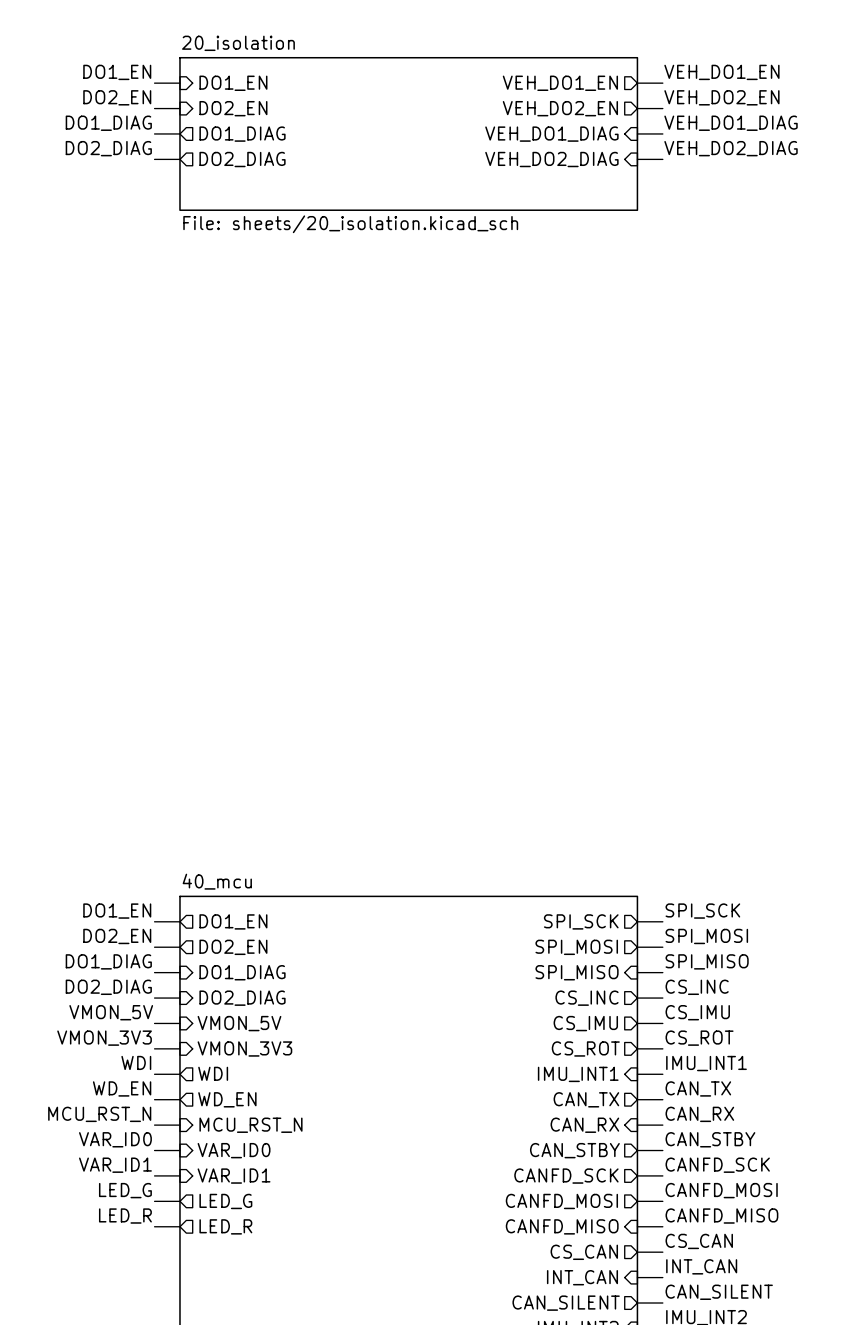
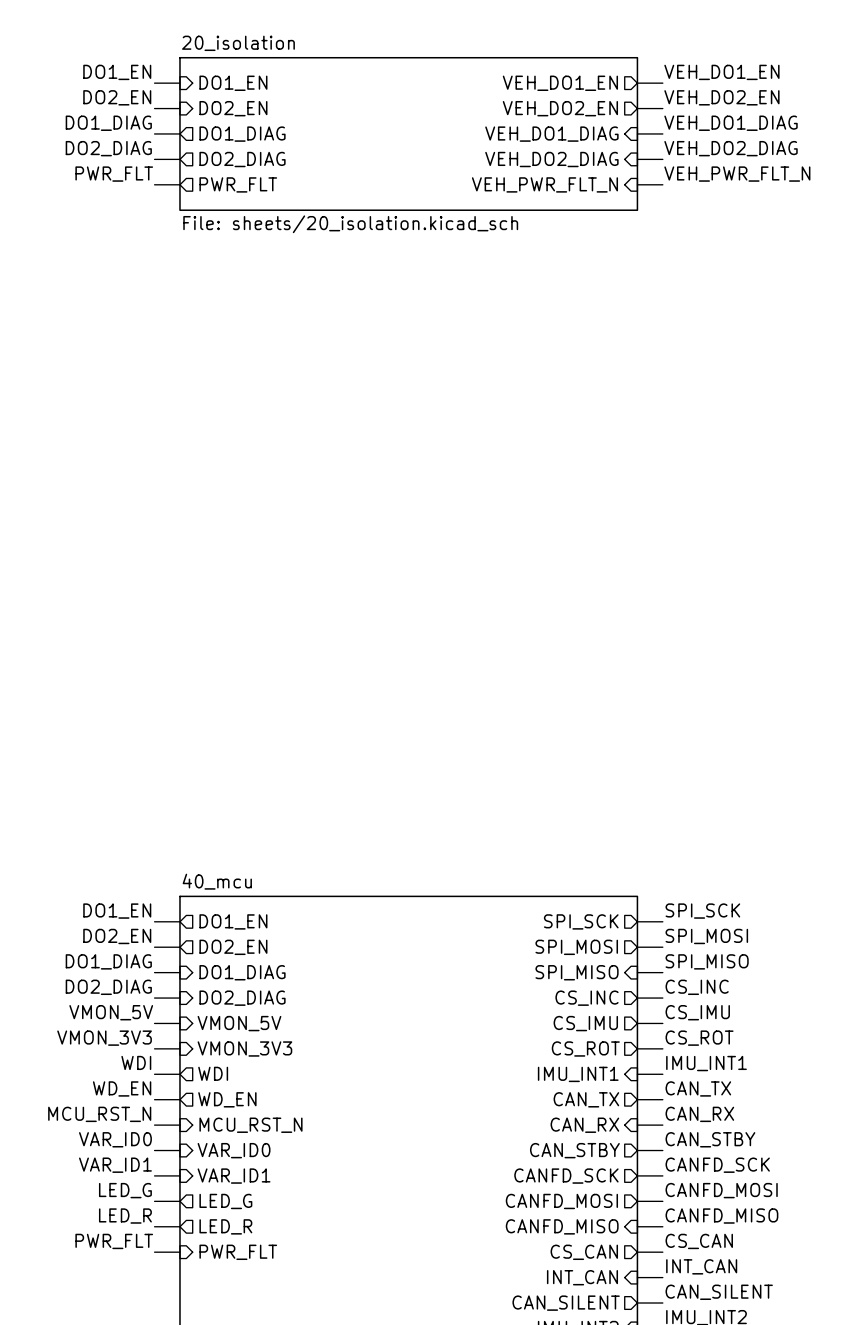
label: none -> PWR_FLT (114, 174)
label: none -> VEH_PWR_FLT_N (737, 174)
wire: none -> (154, 184) (179, 184)
sheet pin: none -> PWR_FLT (238, 184)
sheet pin: none -> VEH_PWR_FLT_N (544, 184)
wire: none -> (637, 184) (662, 184)
label: none -> PWR_FLT (114, 1241)
wire: none -> (154, 1252) (179, 1252)
sheet pin: none -> PWR_FLT (238, 1252)

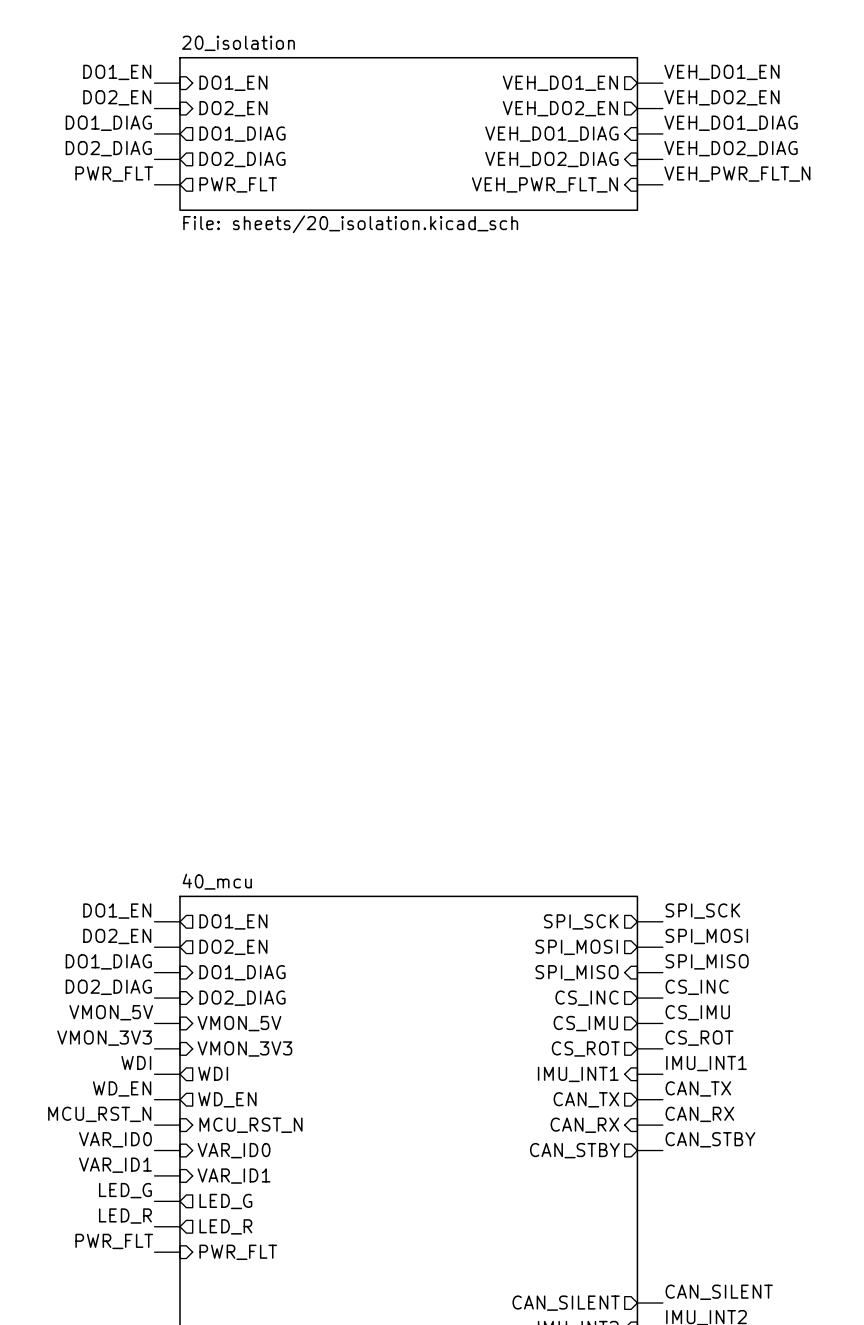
label: CANFD_SCK (717, 1165) -> none
wire: (637, 1175) (662, 1175) -> none
sheet pin: CANFD_SCK (566, 1176) -> none
label: CANFD_MOSI (721, 1190) -> none
sheet pin: CANFD_MOSI (561, 1201) -> none
wire: (637, 1201) (662, 1201) -> none
label: CANFD_MISO (721, 1216) -> none
sheet pin: CANFD_MISO (562, 1226) -> none
wire: (637, 1226) (662, 1226) -> none
label: CS_CAN (699, 1241) -> none
sheet pin: CS_CAN (584, 1252) -> none
wire: (637, 1252) (662, 1252) -> none
label: INT_CAN (701, 1266) -> none
sheet pin: INT_CAN (582, 1277) -> none
wire: (637, 1277) (662, 1277) -> none

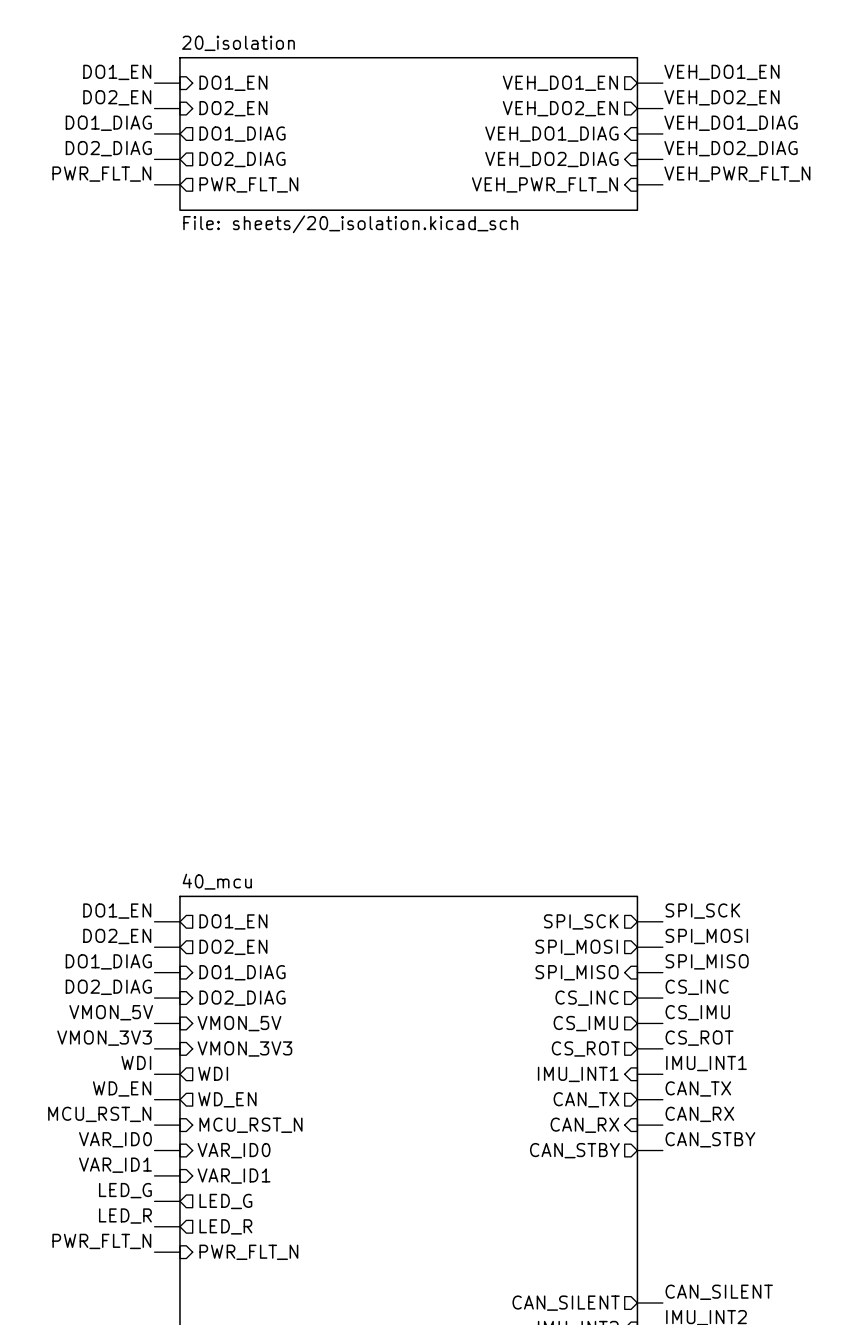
label: PWR_FLT (114, 174) -> PWR_FLT_N (101, 174)
sheet pin: PWR_FLT (238, 184) -> PWR_FLT_N (248, 184)
label: PWR_FLT (114, 1241) -> PWR_FLT_N (101, 1241)
sheet pin: PWR_FLT (238, 1252) -> PWR_FLT_N (248, 1252)

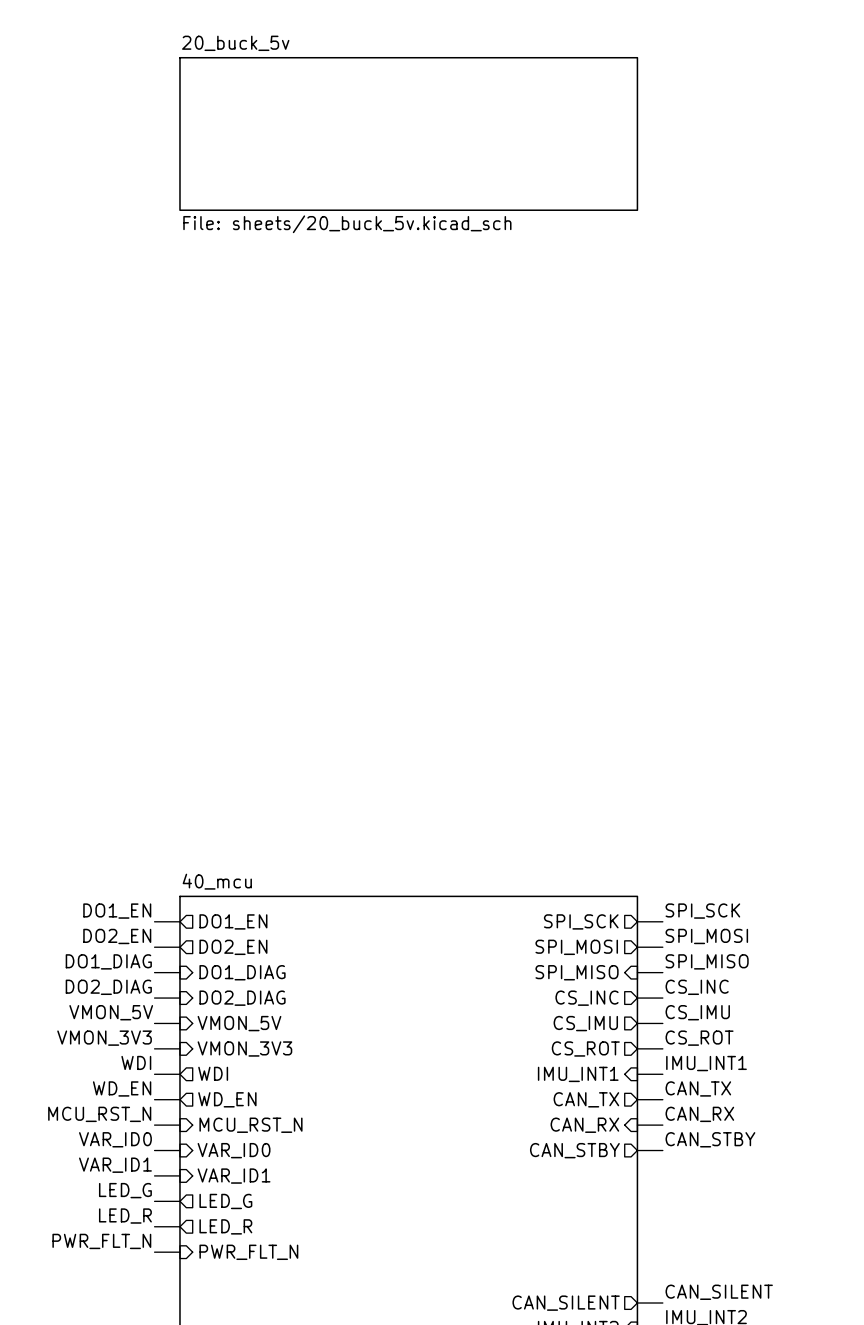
sheet 20_isolation name: 20_isolation (238, 43) -> 20_buck_5v (235, 43)
label: DO1_EN (117, 72) -> none
label: VEH_DO1_EN (721, 72) -> none
wire: (154, 83) (179, 83) -> none
sheet pin: DO1_EN (233, 83) -> none
sheet pin: VEH_DO1_EN (560, 83) -> none
wire: (637, 83) (662, 83) -> none
label: DO2_EN (117, 97) -> none
label: VEH_DO2_EN (721, 97) -> none
wire: (154, 108) (179, 108) -> none
sheet pin: DO2_EN (233, 108) -> none
sheet pin: VEH_DO2_EN (560, 108) -> none
wire: (637, 108) (662, 108) -> none
label: DO1_DIAG (108, 123) -> none
label: VEH_DO1_DIAG (731, 123) -> none
wire: (154, 133) (179, 133) -> none
wire: (637, 133) (662, 133) -> none
sheet pin: DO1_DIAG (242, 134) -> none
sheet pin: VEH_DO1_DIAG (551, 134) -> none
label: DO2_DIAG (108, 148) -> none
label: VEH_DO2_DIAG (731, 148) -> none
wire: (154, 159) (179, 159) -> none
sheet pin: DO2_DIAG (242, 159) -> none
sheet pin: VEH_DO2_DIAG (551, 159) -> none
wire: (637, 159) (662, 159) -> none
label: PWR_FLT_N (101, 174) -> none
label: VEH_PWR_FLT_N (737, 174) -> none
wire: (154, 184) (179, 184) -> none
sheet pin: PWR_FLT_N (248, 184) -> none
sheet pin: VEH_PWR_FLT_N (544, 184) -> none
wire: (637, 184) (662, 184) -> none
sheet 20_isolation value: File: sheets/20_isolation.kicad_sch (350, 224) -> File: sheets/20_buck_5v.kicad_sch (347, 224)

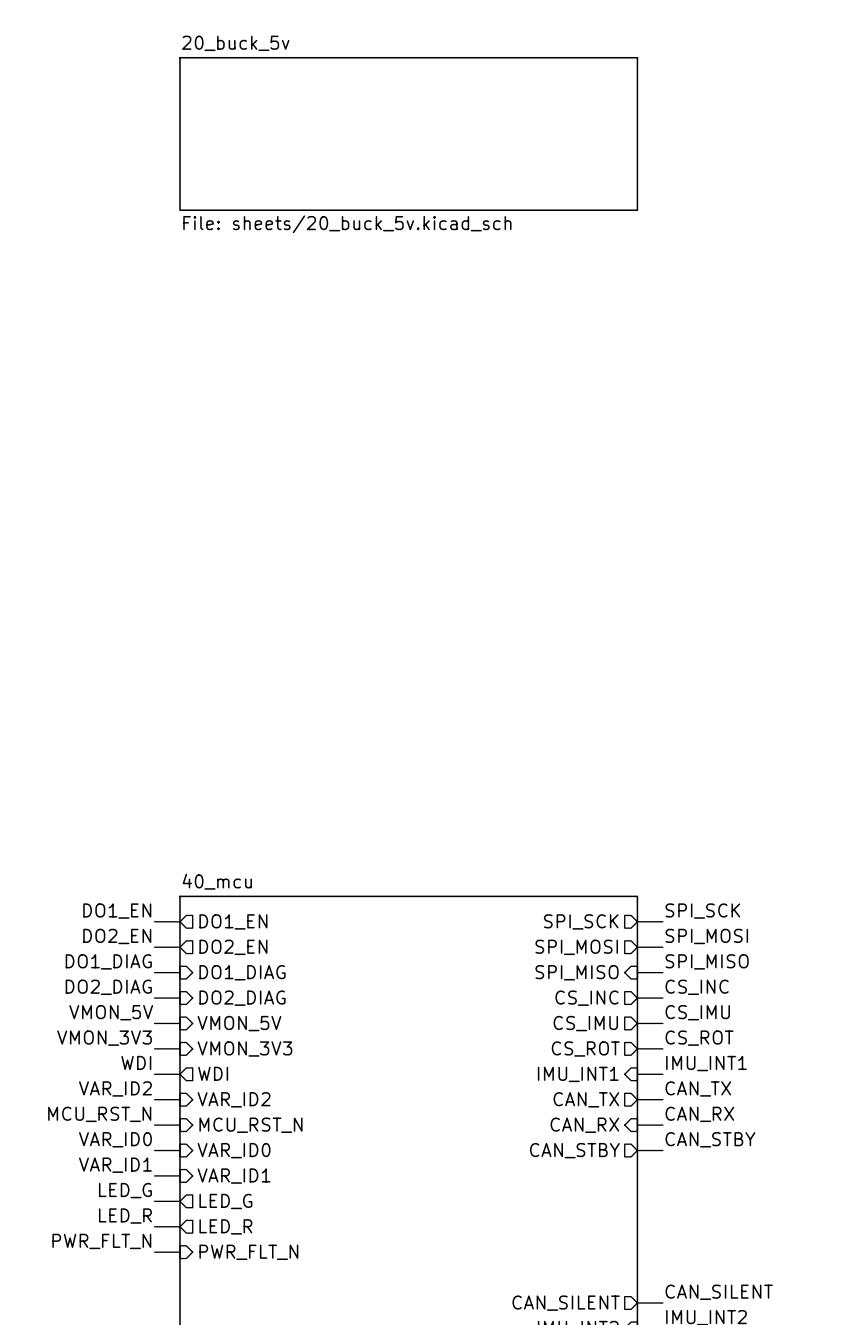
label: WD_EN (122, 1088) -> VAR_ID2 (115, 1088)
sheet pin shape: output (227, 1099) -> input (234, 1099)
sheet pin: WD_EN (227, 1099) -> VAR_ID2 (234, 1099)

